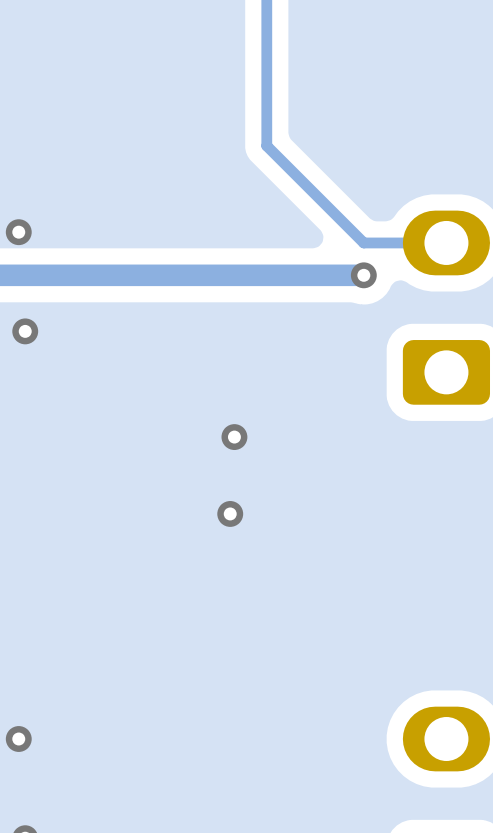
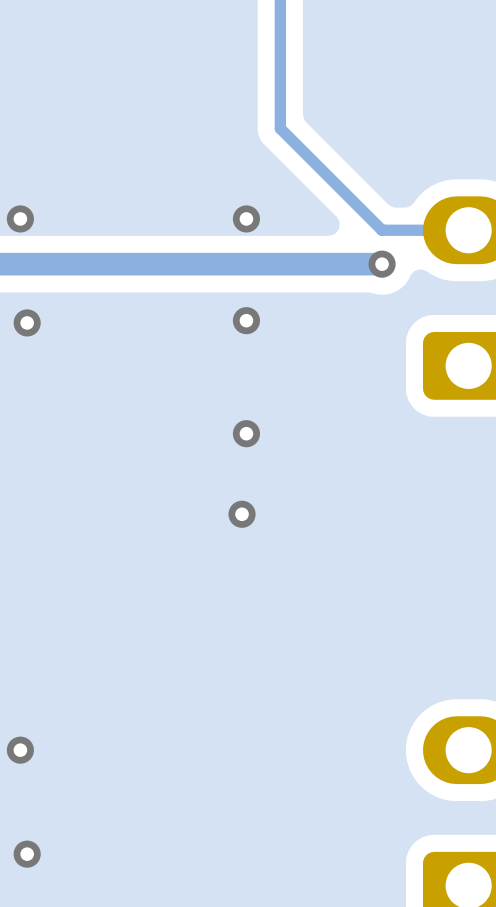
via: none -> (246, 218)
via: none -> (246, 320)

